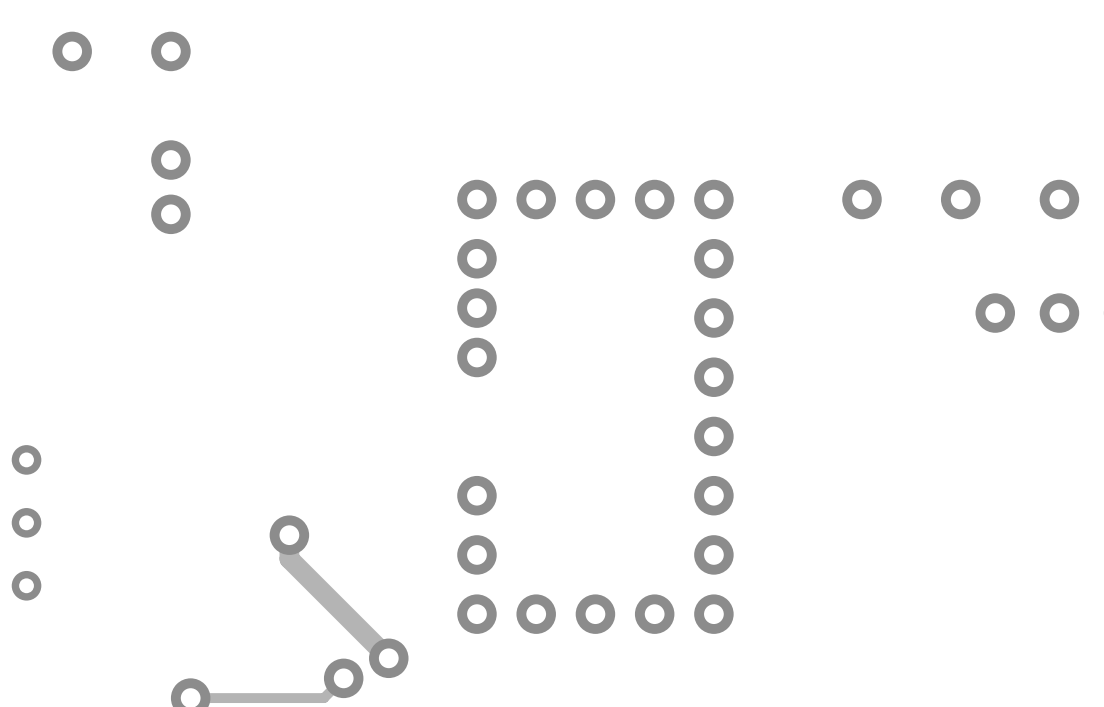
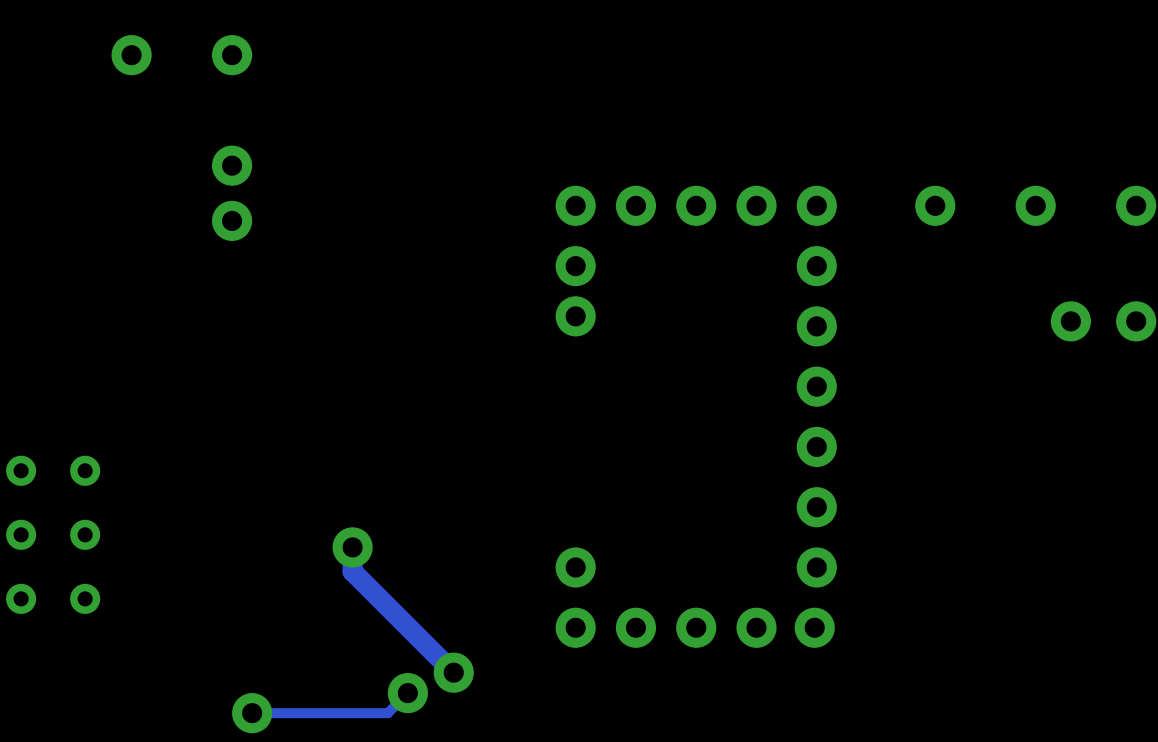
via: (476, 199) -> none
via: none -> (575, 205)
via: (536, 199) -> none
via: none -> (635, 205)
via: (595, 199) -> none
via: none -> (696, 205)
via: (654, 199) -> none
via: none -> (756, 205)
via: (713, 199) -> none
via: none -> (816, 205)
via position: (476, 258) -> (575, 266)
via position: (713, 258) -> (816, 266)
via position: (476, 308) -> (575, 316)
via position: (713, 317) -> (816, 326)
via: (476, 357) -> none
via position: (713, 377) -> (816, 386)
via position: (713, 436) -> (816, 446)
via: (476, 495) -> none
via position: (713, 495) -> (816, 507)
via position: (476, 554) -> (575, 567)
via position: (713, 554) -> (816, 567)
via: (476, 614) -> none
via: none -> (575, 627)
via: (536, 614) -> none
via: none -> (635, 627)
via: (595, 614) -> none
via: none -> (696, 627)
via: (654, 614) -> none
via: none -> (756, 627)
via: (713, 614) -> none
via: none -> (814, 627)

